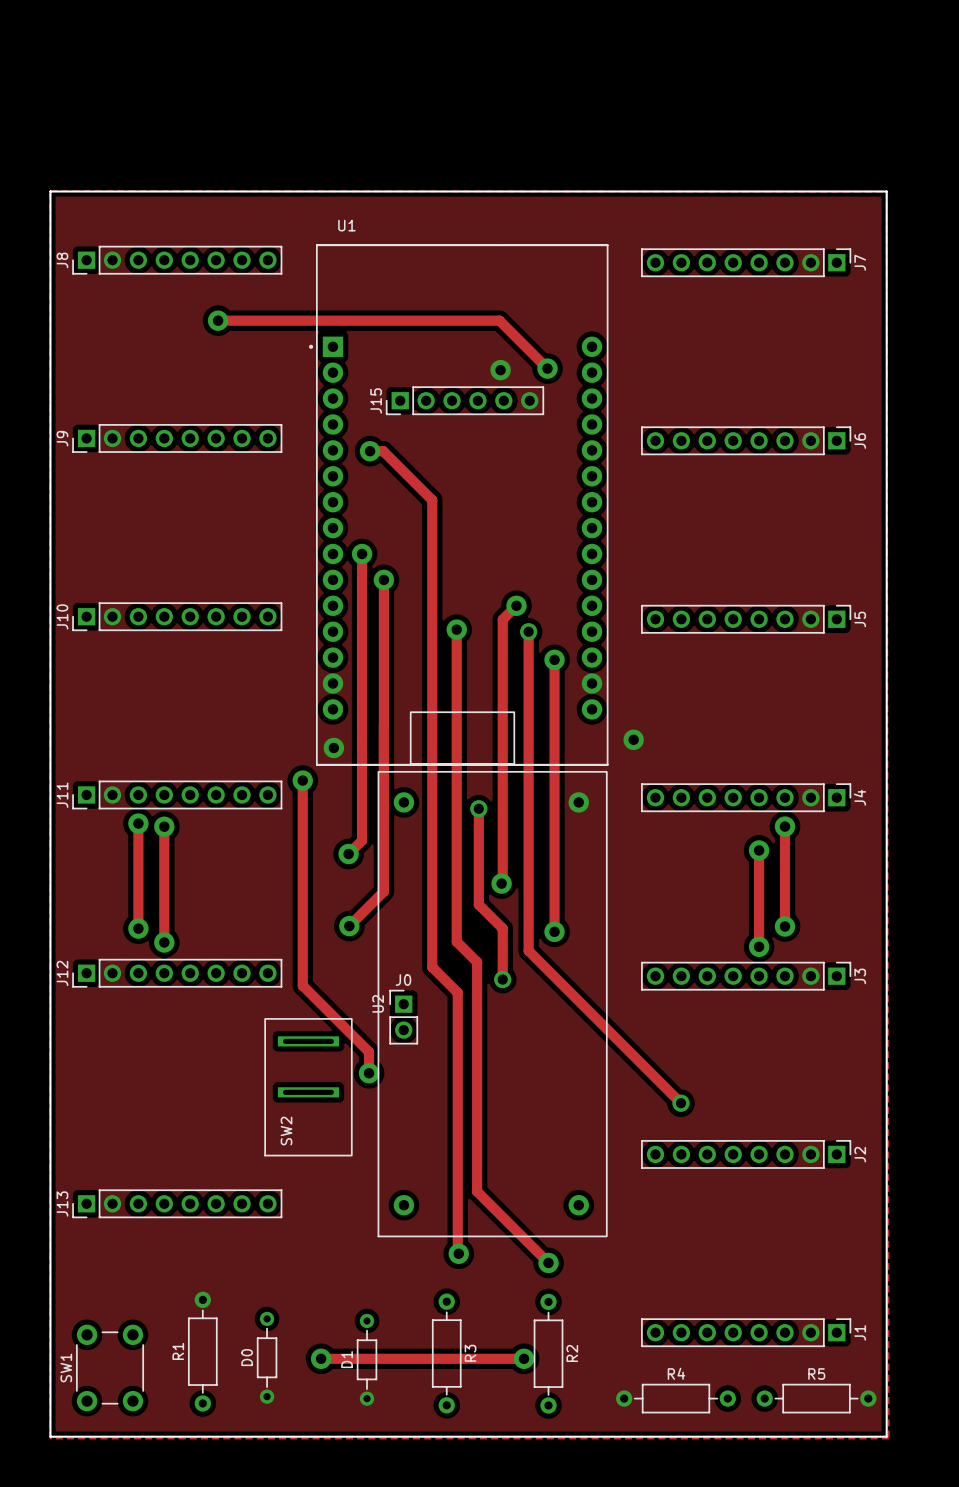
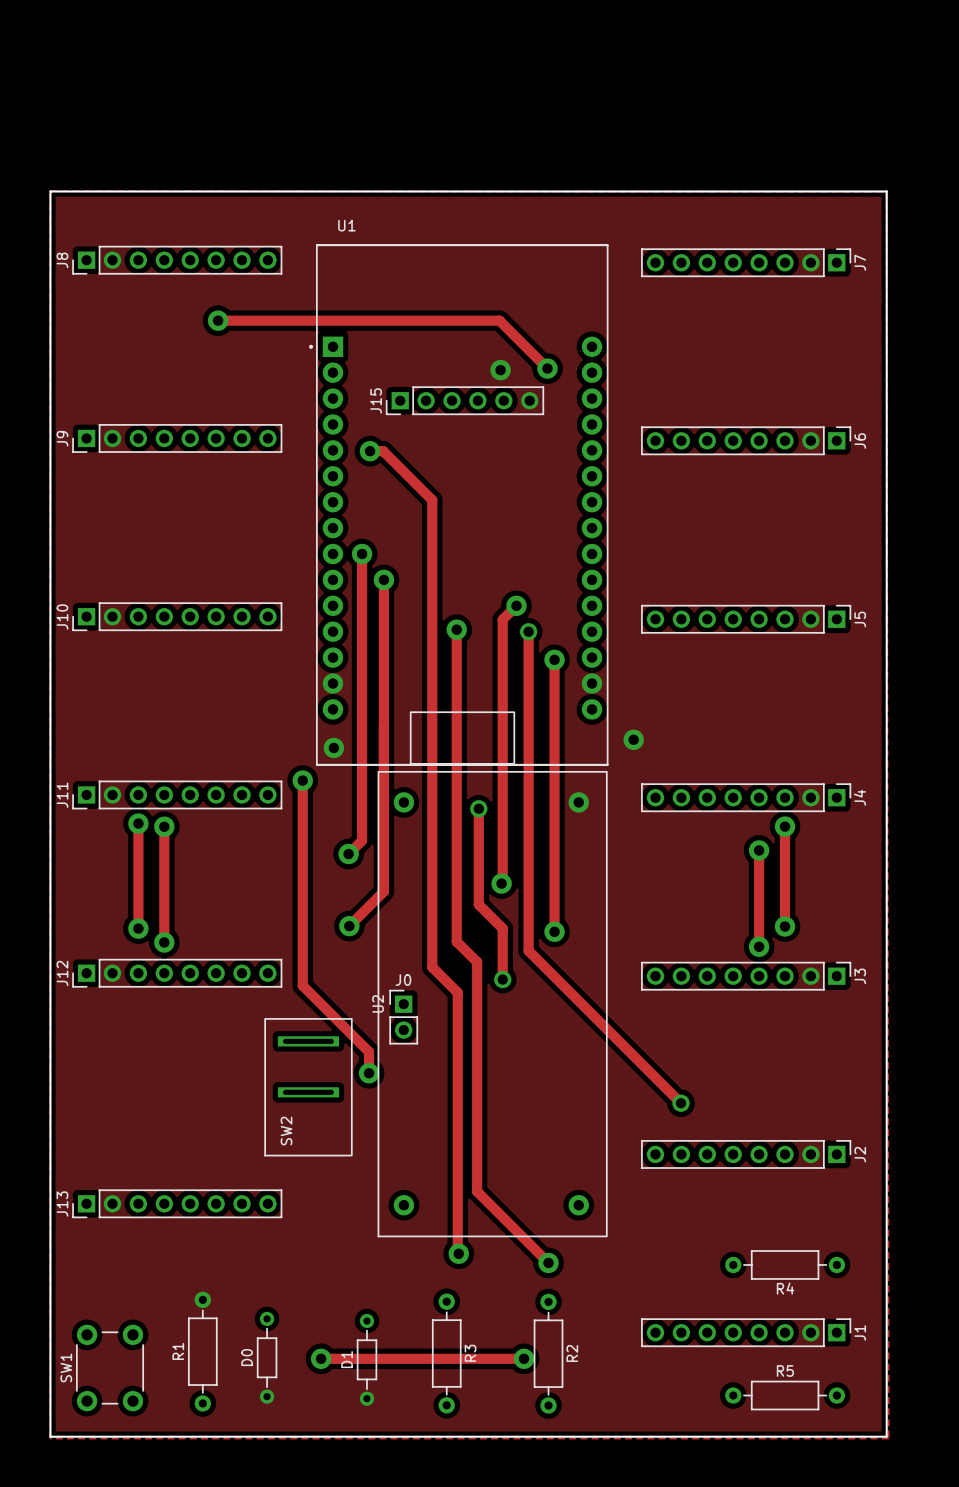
R4 name position: R4 (676, 1373) -> R4 (785, 1288)
R4 position: (675, 1398) -> (785, 1264)
R5 position: (816, 1398) -> (785, 1395)

